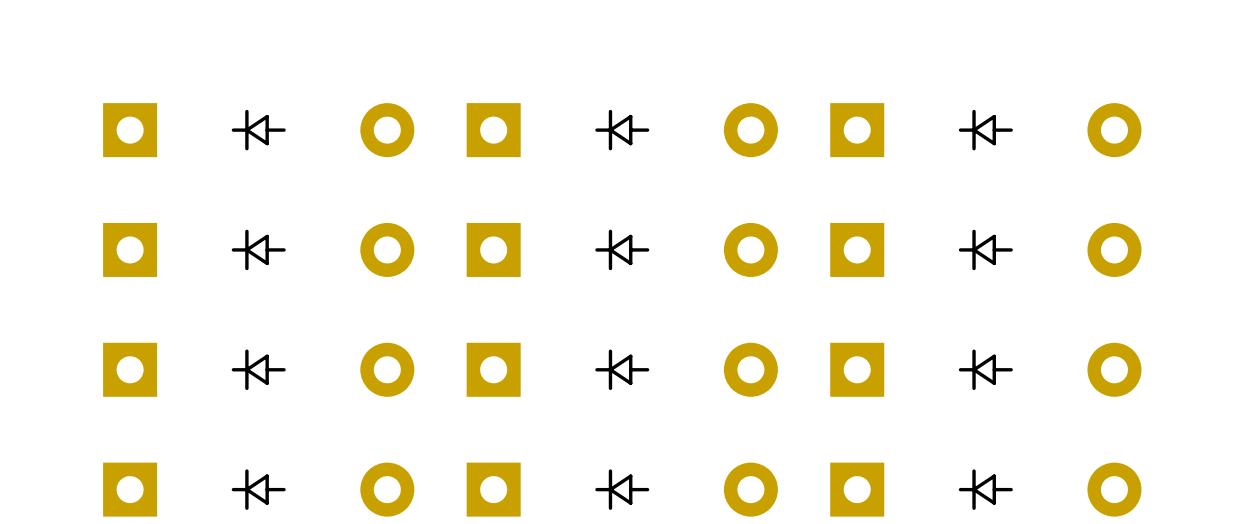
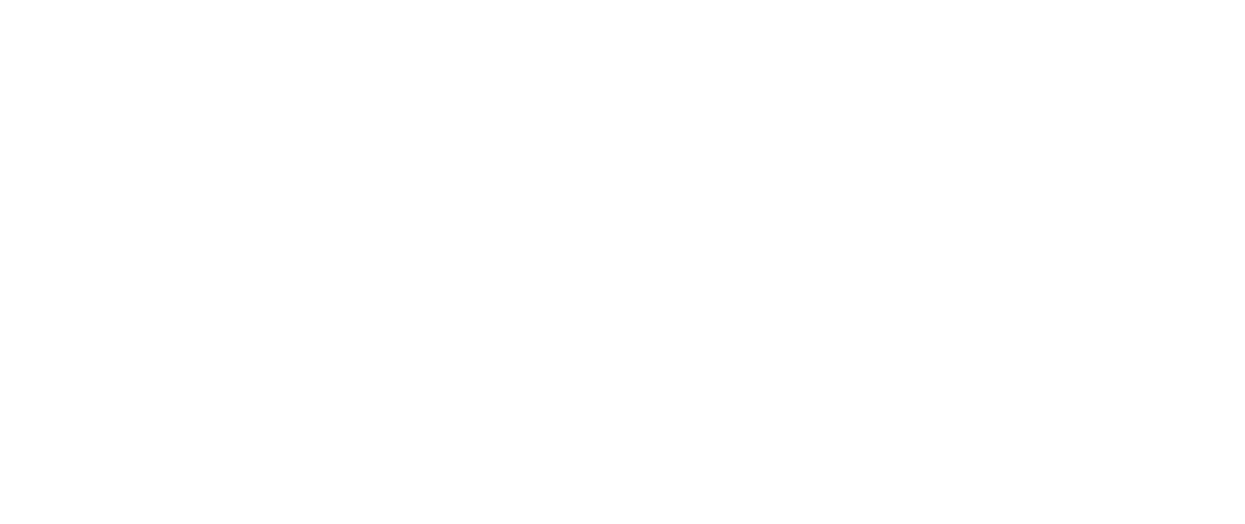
part: (258, 130) -> none
part: (622, 130) -> none
part: (985, 130) -> none
part: (258, 249) -> none
part: (622, 249) -> none
part: (985, 249) -> none
part: (258, 369) -> none
part: (622, 369) -> none
part: (985, 369) -> none
part: (258, 489) -> none
part: (622, 489) -> none
part: (985, 489) -> none

